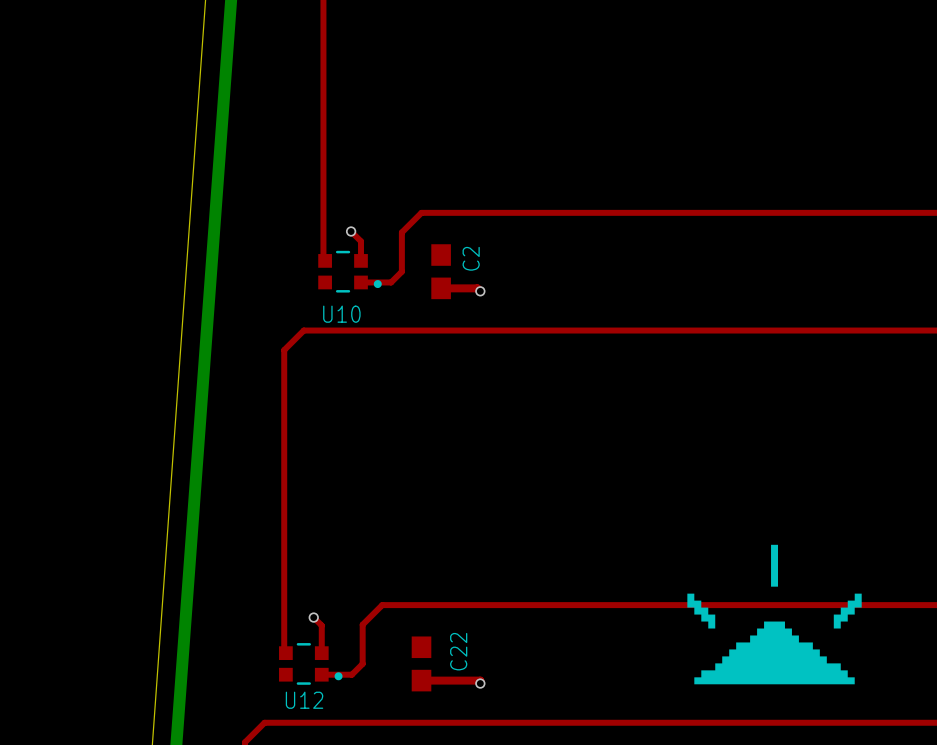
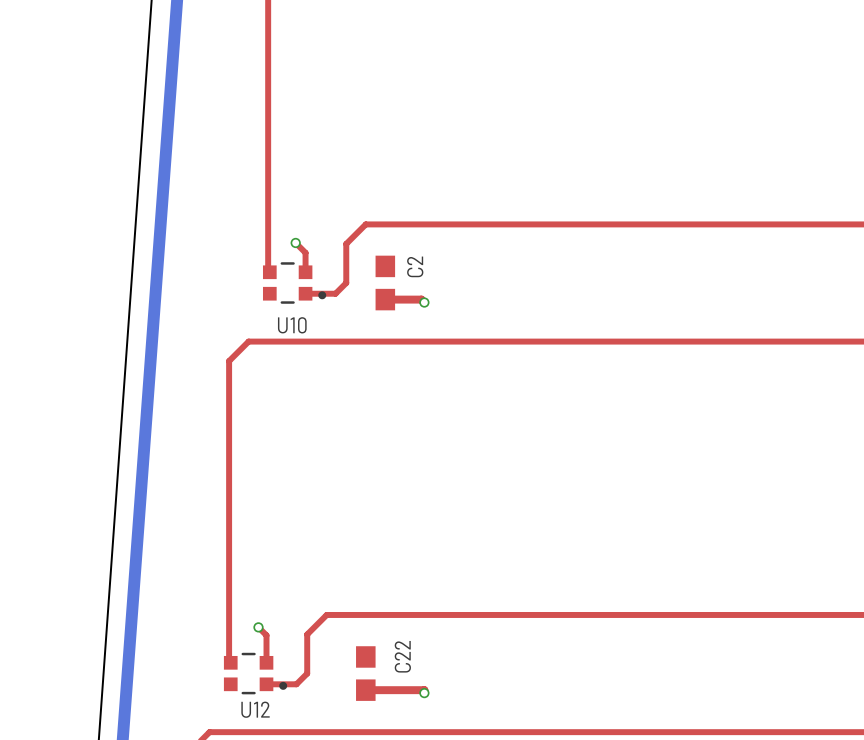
drawing: [771, 544, 779, 587] -> none
drawing: [687, 593, 716, 629] -> none
drawing: [833, 593, 862, 629] -> none
drawing: [694, 621, 855, 685] -> none

